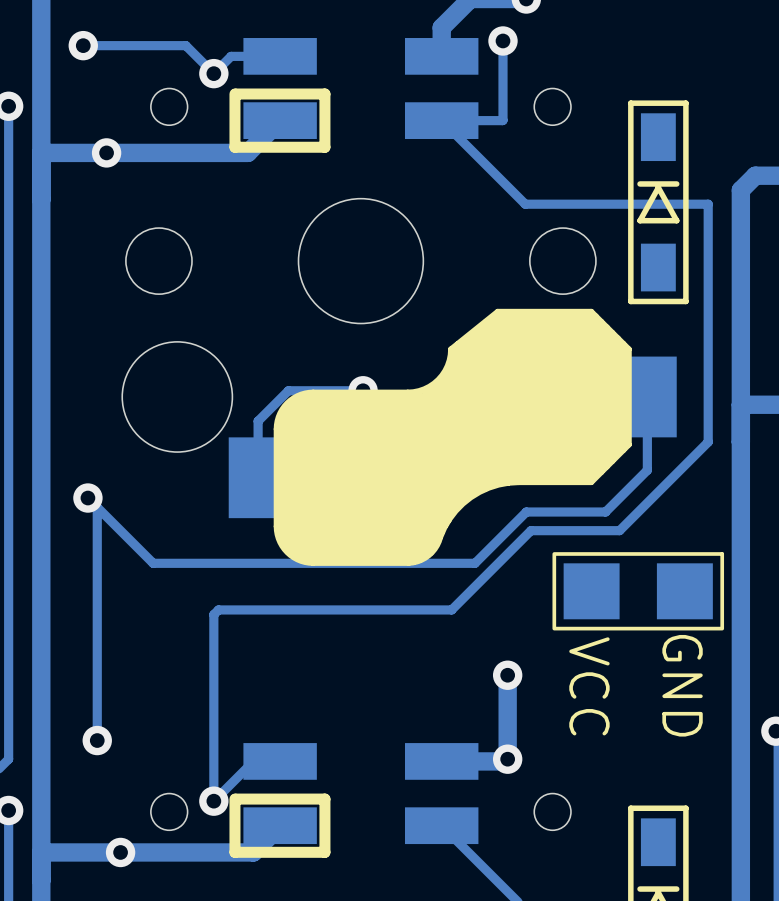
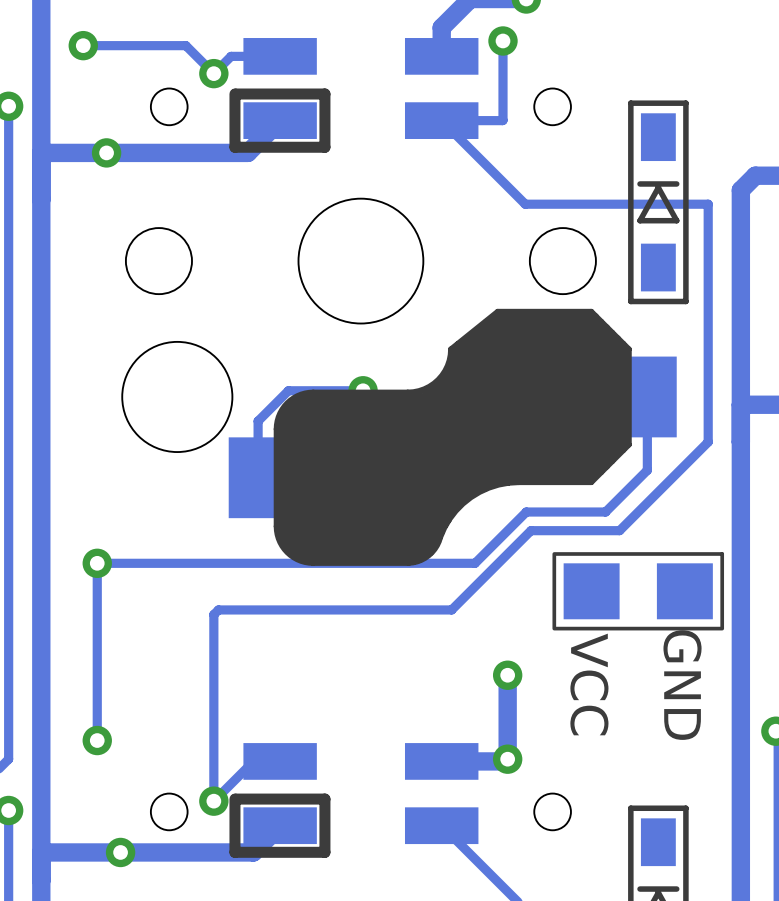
track: (87, 498) (153, 563) -> (97, 563) (153, 563)
via position: (87, 498) -> (97, 563)
track: (97, 507) (97, 563) -> none

